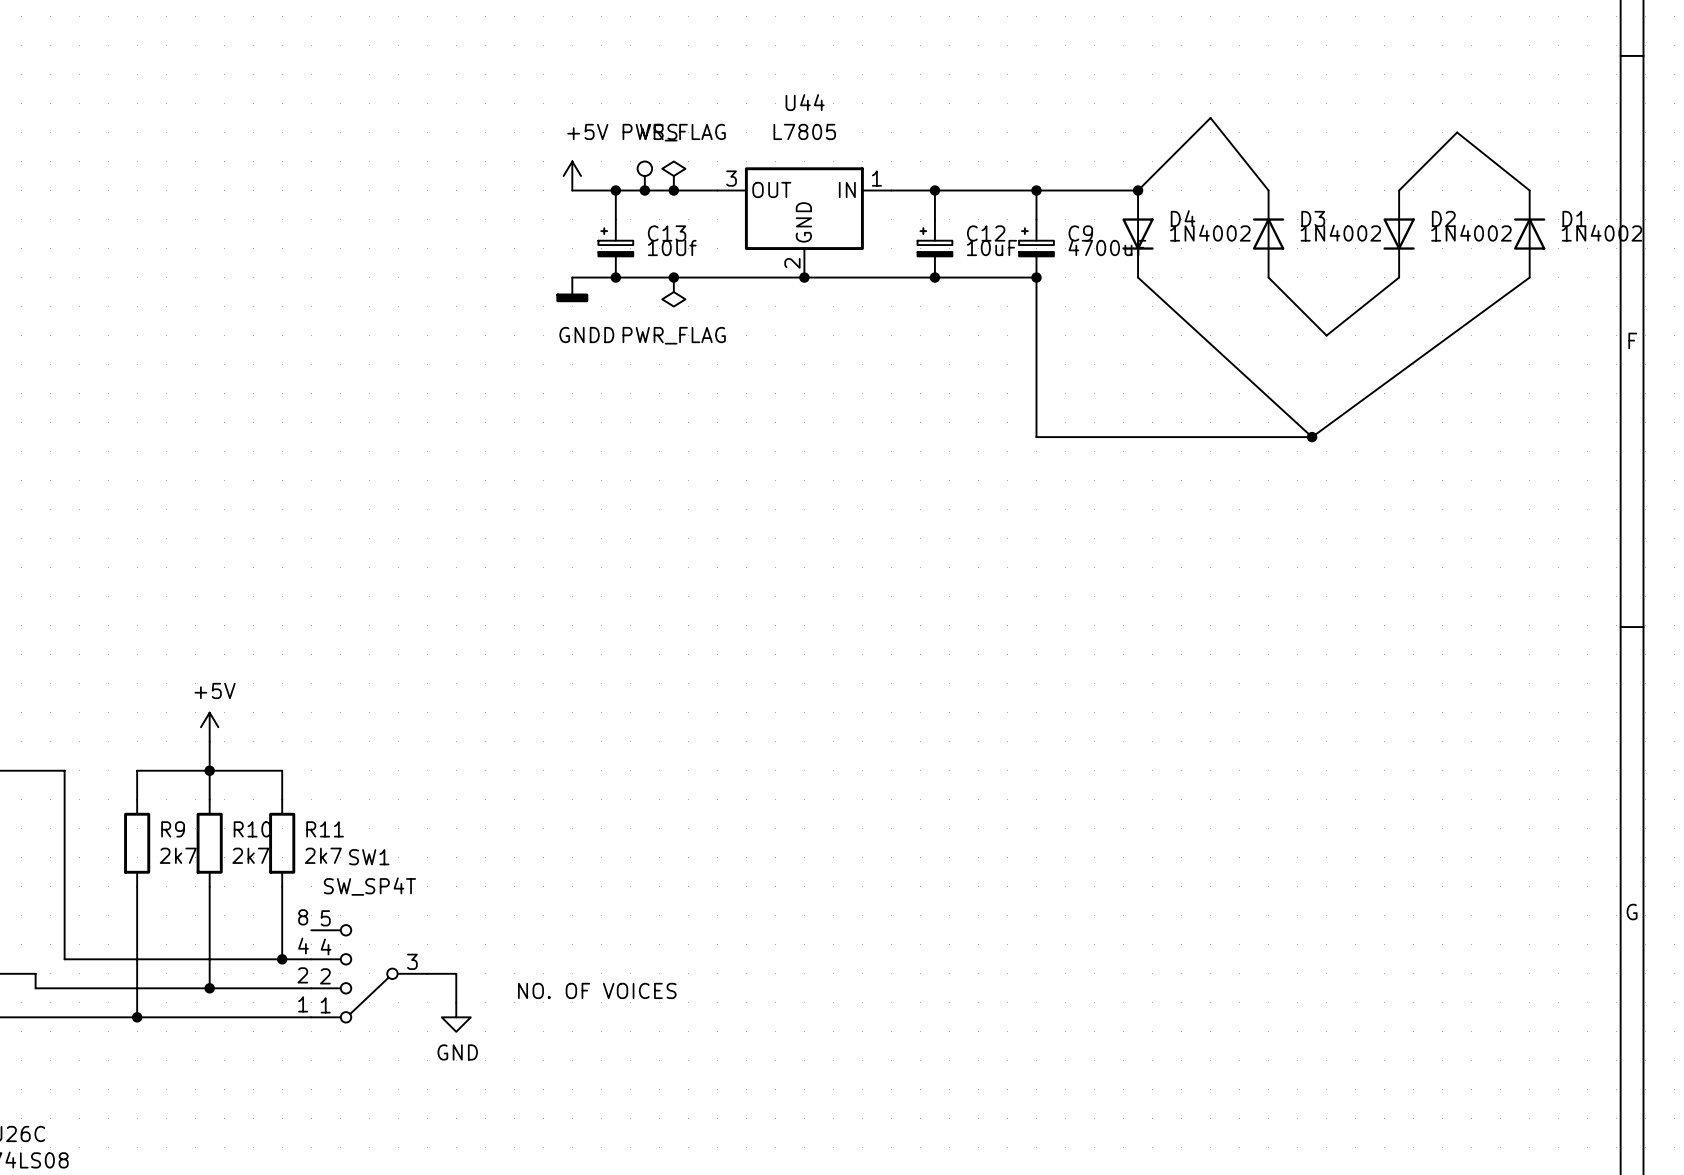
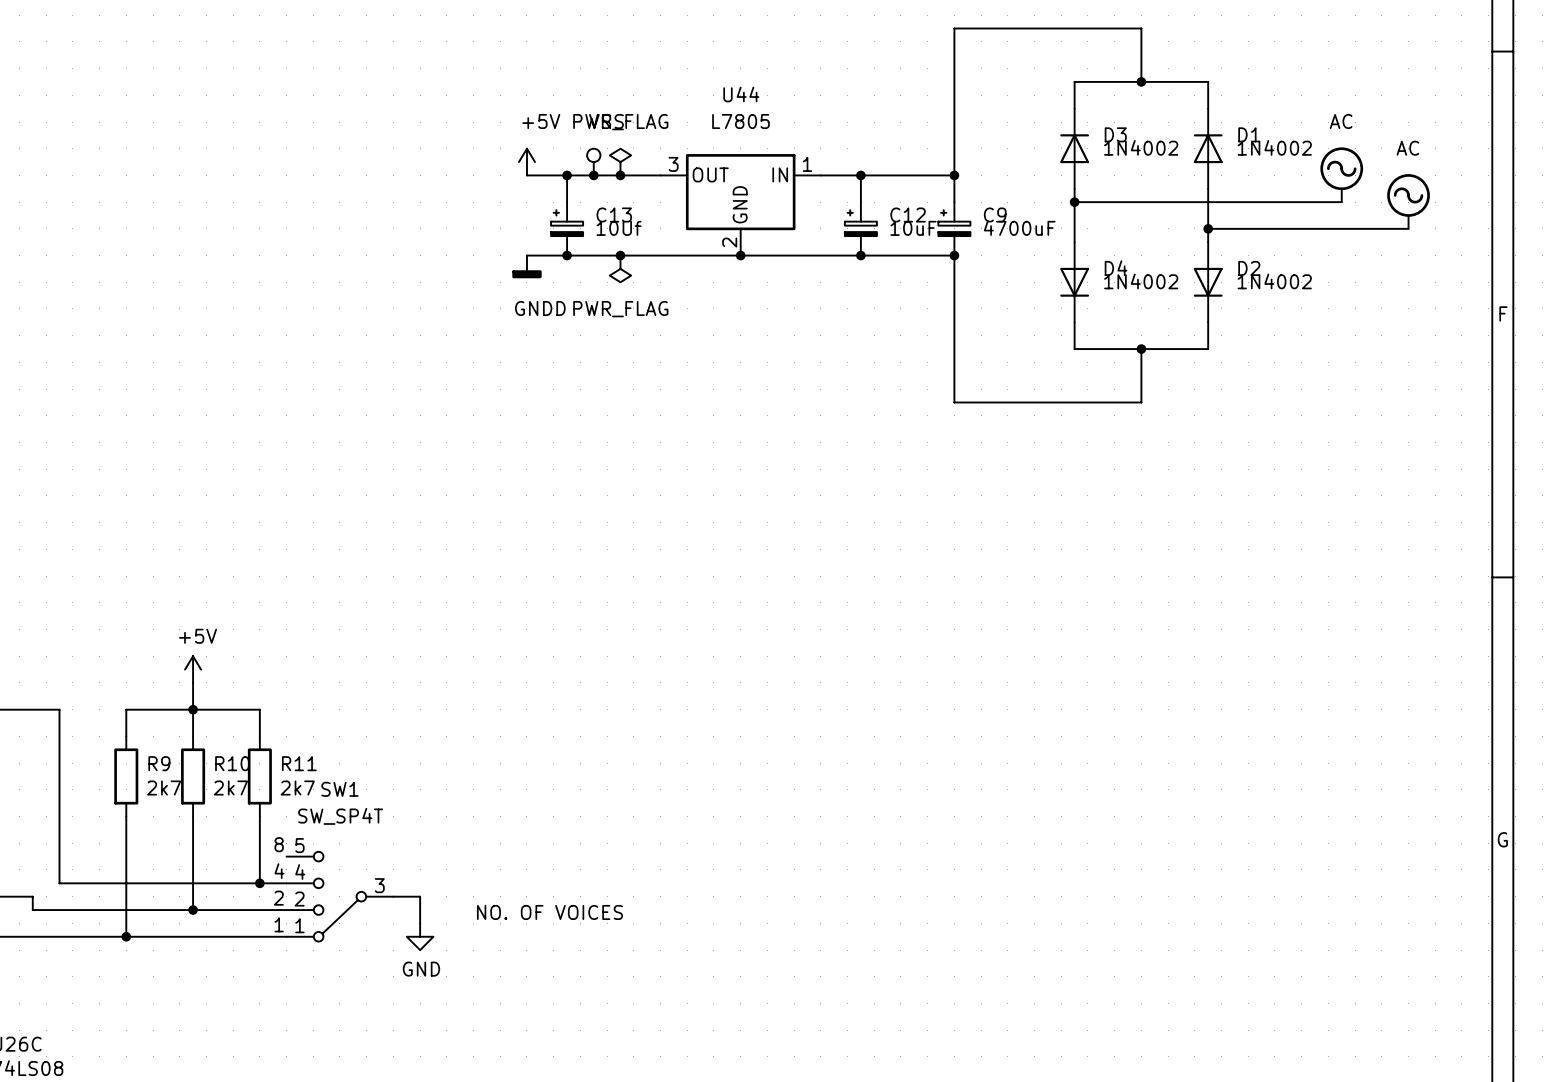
junction: none -> (1141, 81)
wire: none -> (1074, 108) (1074, 81) (1208, 81) (1208, 108)
power symbol: none -> AC (1341, 174)
wire: (1036, 190) (1138, 190) (1210, 117) (1268, 190) -> (954, 175) (954, 28) (1141, 28) (1141, 81)
junction position: (1138, 190) -> (1074, 202)
wire: (1399, 190) (1457, 132) (1529, 190) -> none
wire: none -> (1074, 188) (1074, 242)
wire: none -> (1208, 188) (1208, 242)
power symbol: none -> AC (1408, 201)
wire: none -> (1074, 202) (1341, 202)
D4 position: (1138, 234) -> (1074, 282)
D3 position: (1268, 234) -> (1074, 148)
D2 position: (1399, 234) -> (1208, 282)
D1 position: (1529, 234) -> (1208, 148)
wire: none -> (1208, 228) (1408, 228)
junction: none -> (1208, 228)
wire: (1138, 277) (1312, 437) -> none
wire: (1268, 277) (1326, 335) (1399, 277) -> none
wire: (1529, 277) (1312, 437) -> none
wire: none -> (1074, 322) (1074, 349) (1208, 349) (1208, 322)
junction: none -> (1141, 349)
wire: (1239, 437) (1312, 437) -> (1141, 402) (1141, 349)
junction: (1312, 437) -> none

